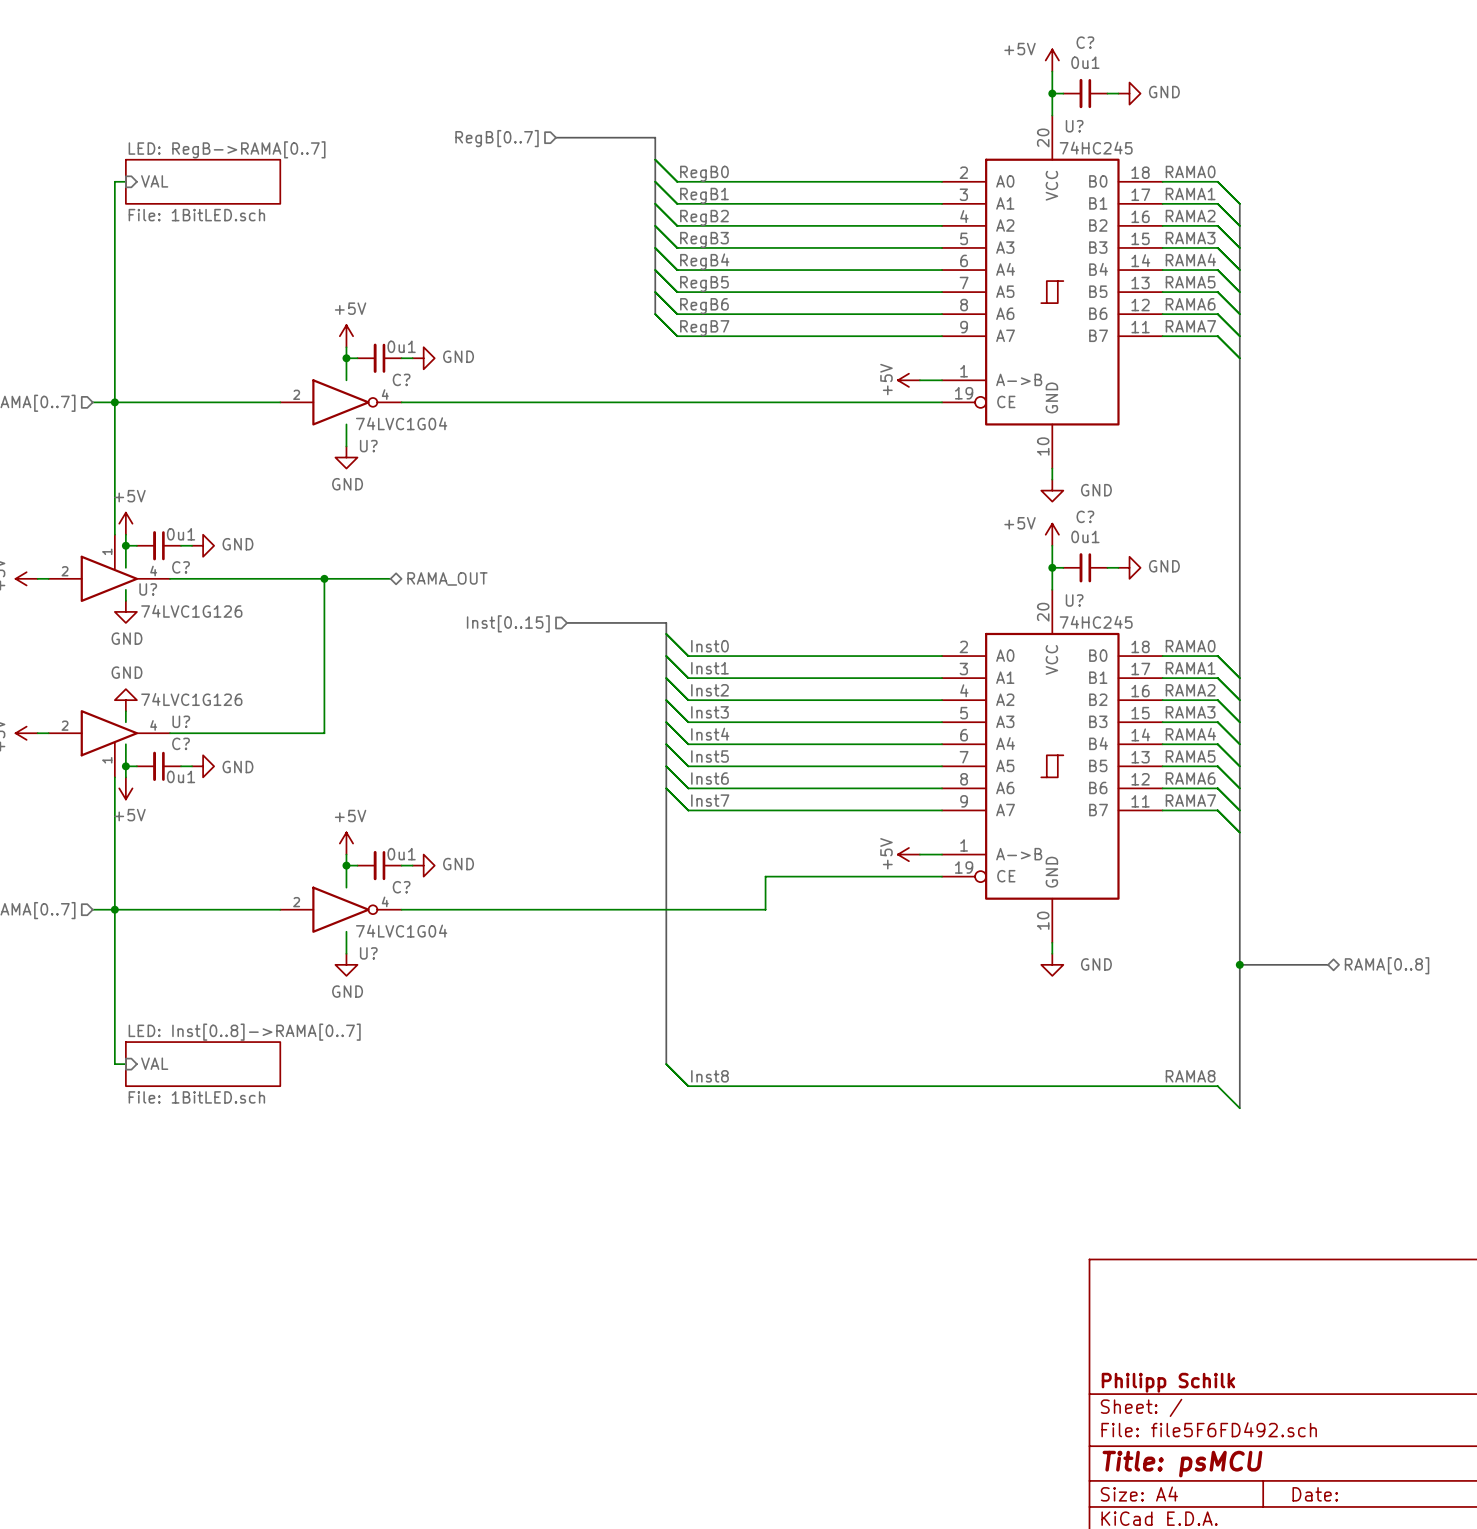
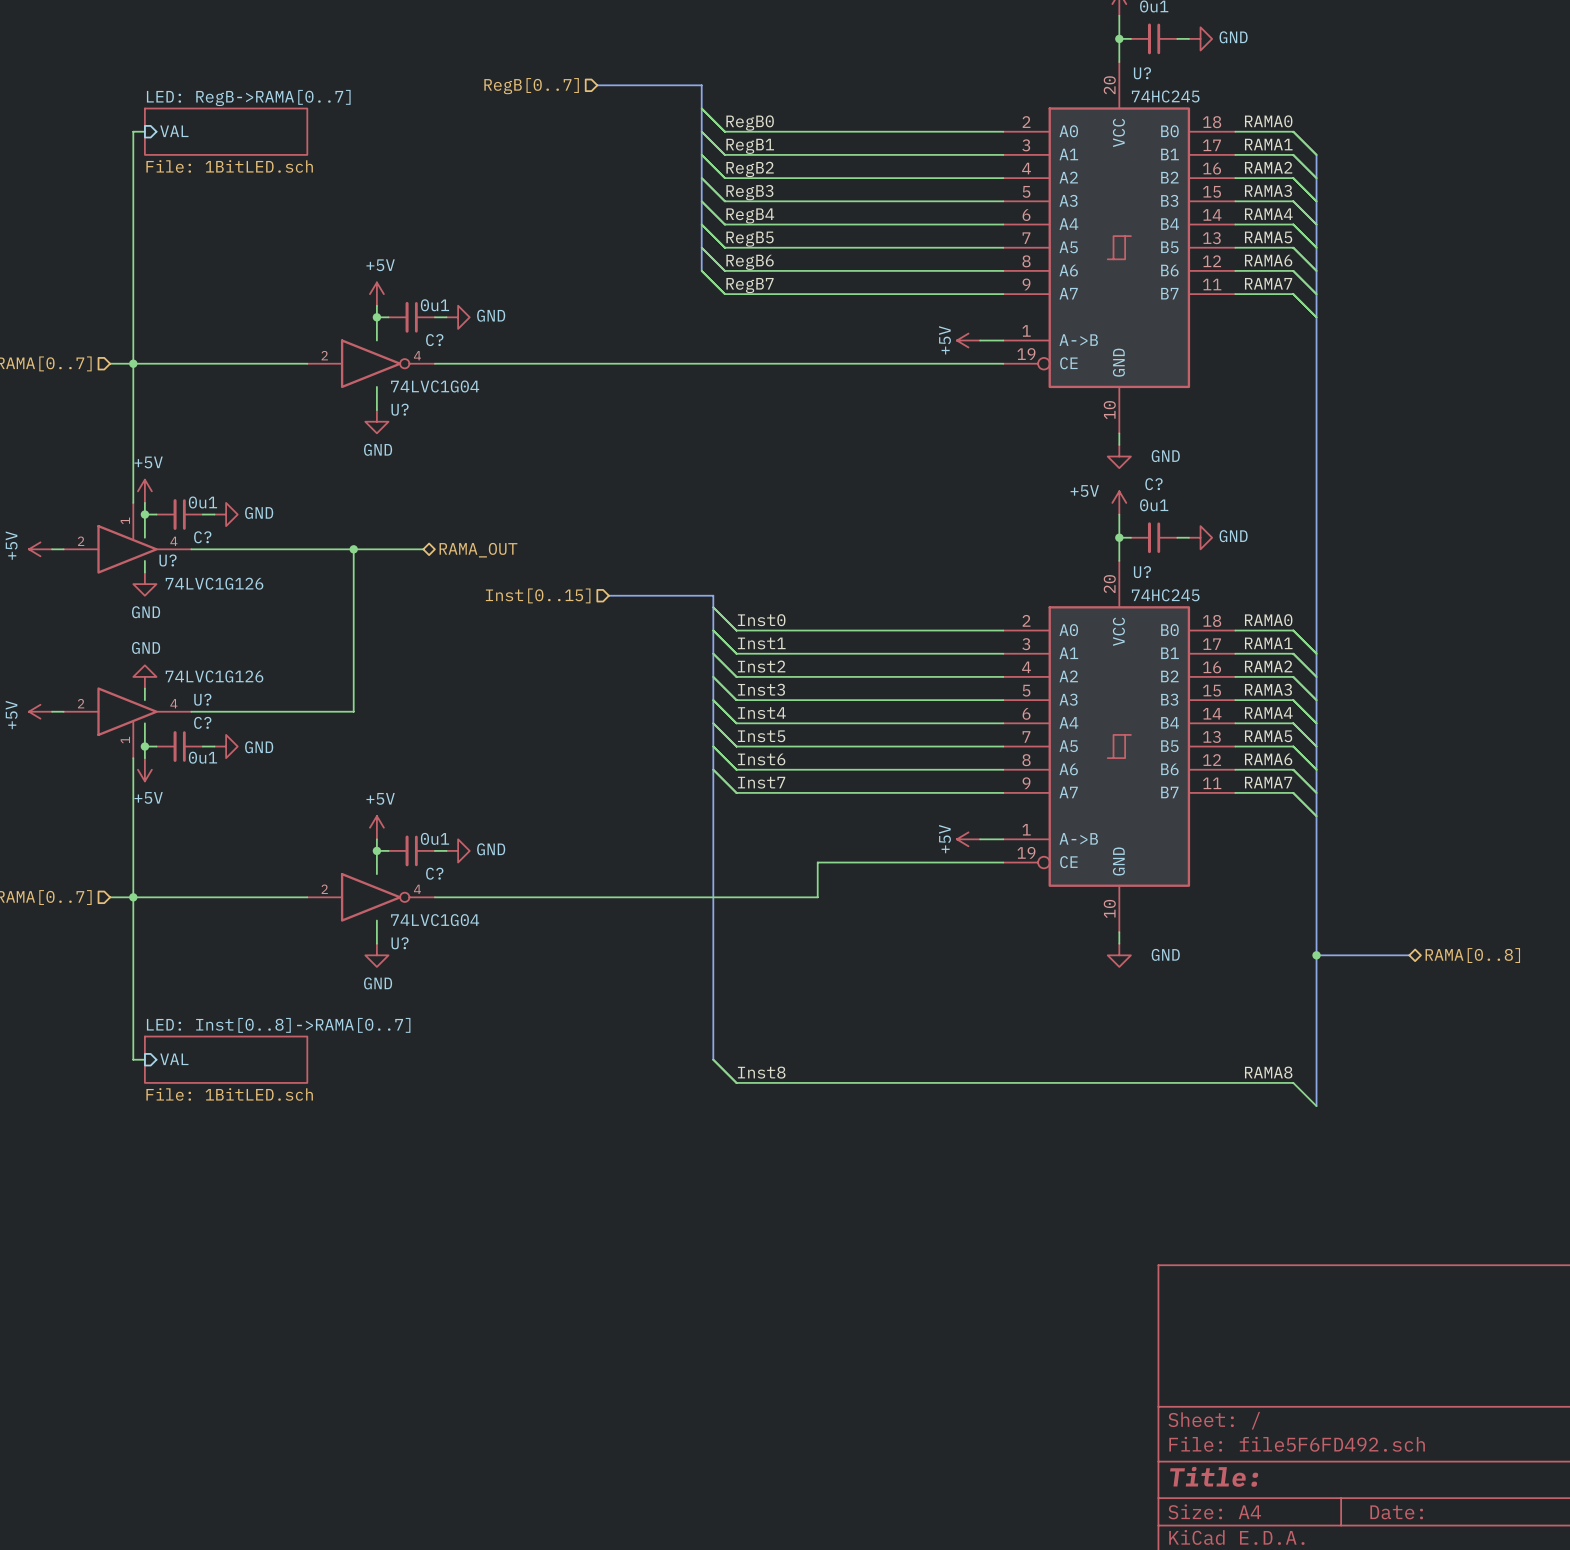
title block: Philipp Schilk (1168, 1382) -> none
title block: Title: psMCU (1182, 1464) -> Title: (1214, 1476)

